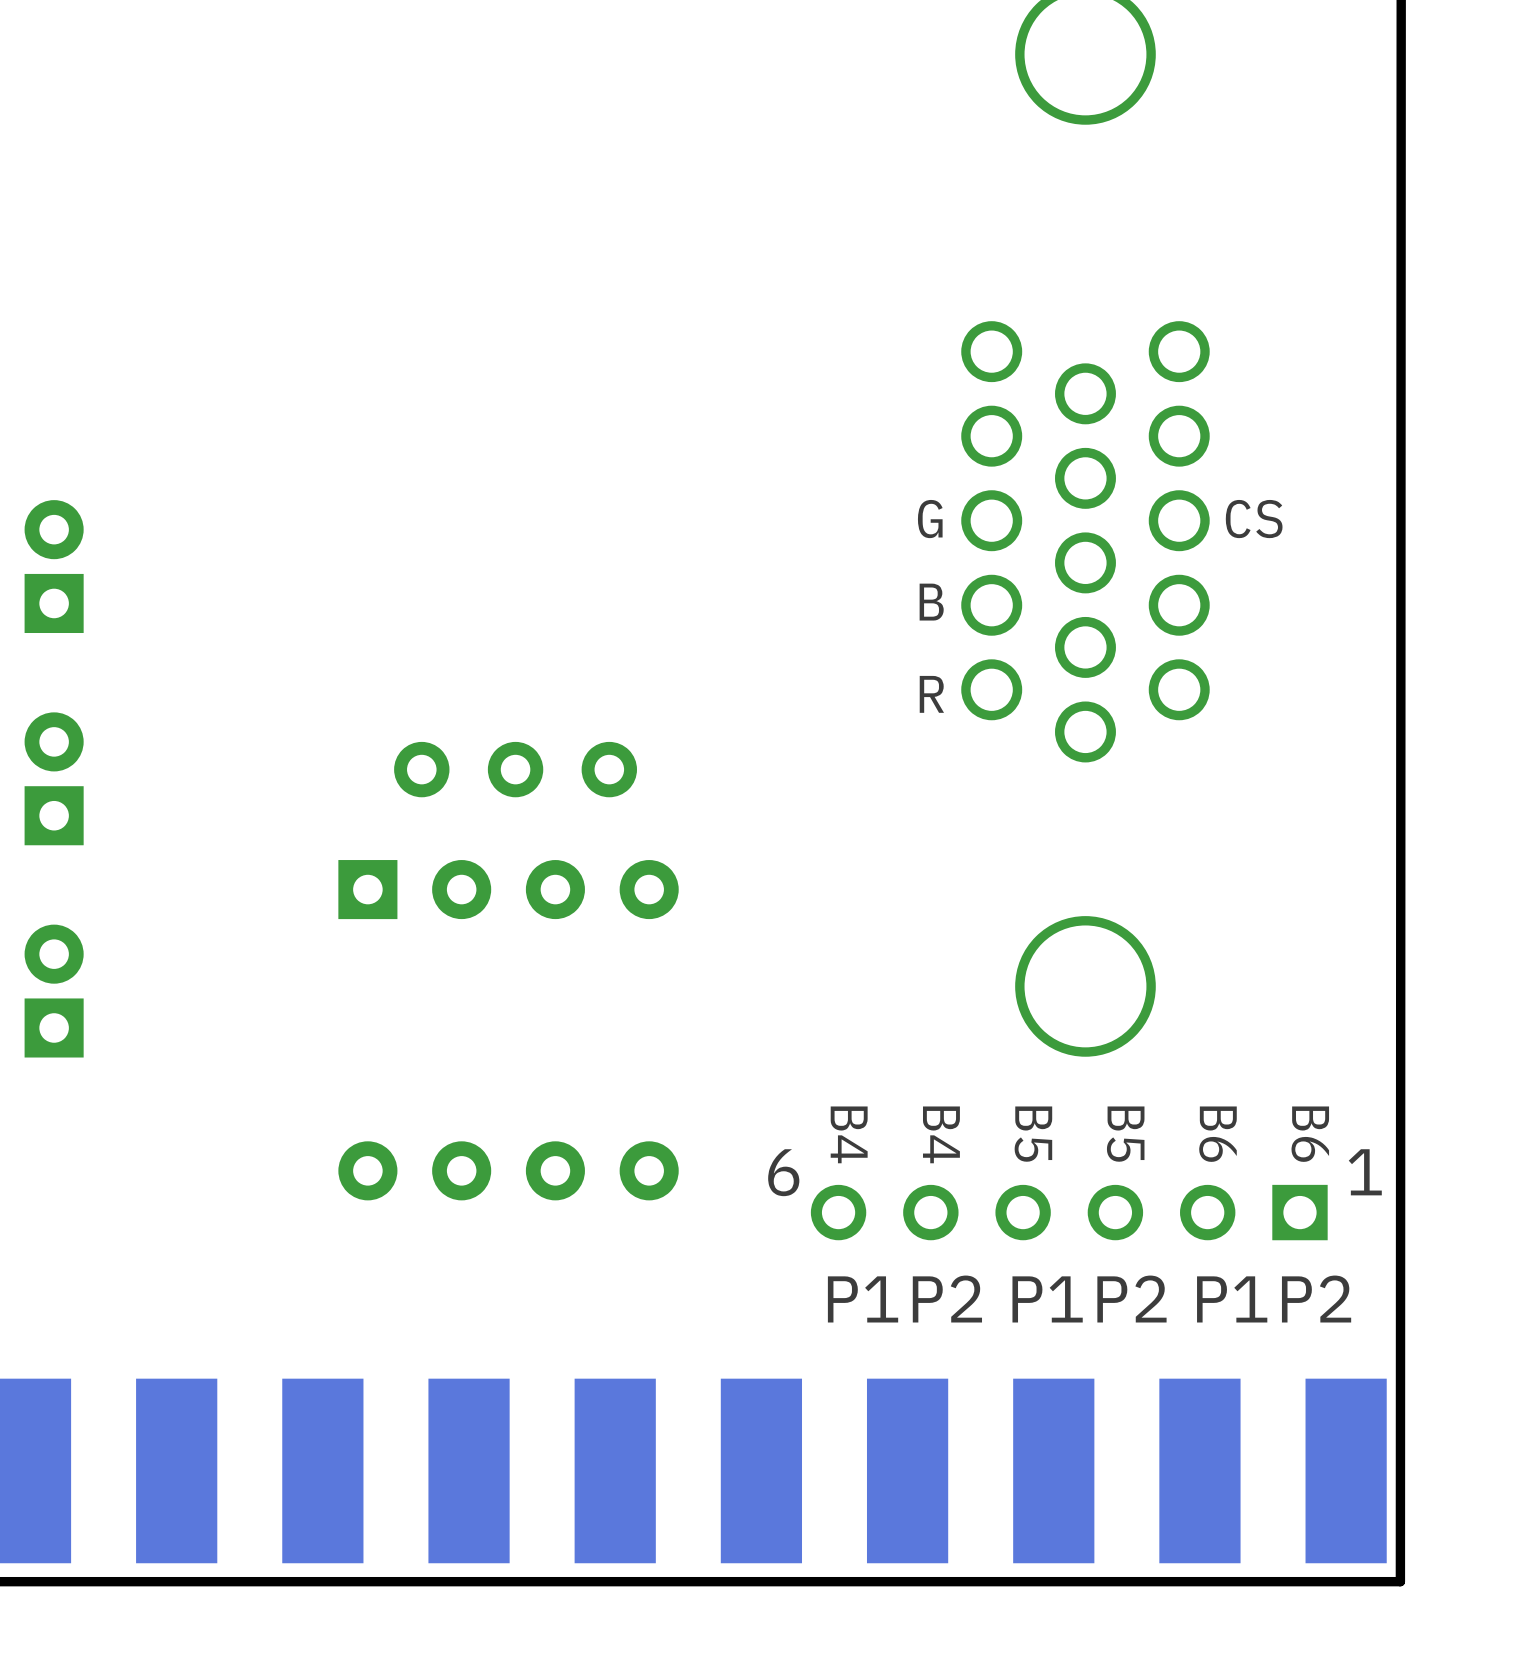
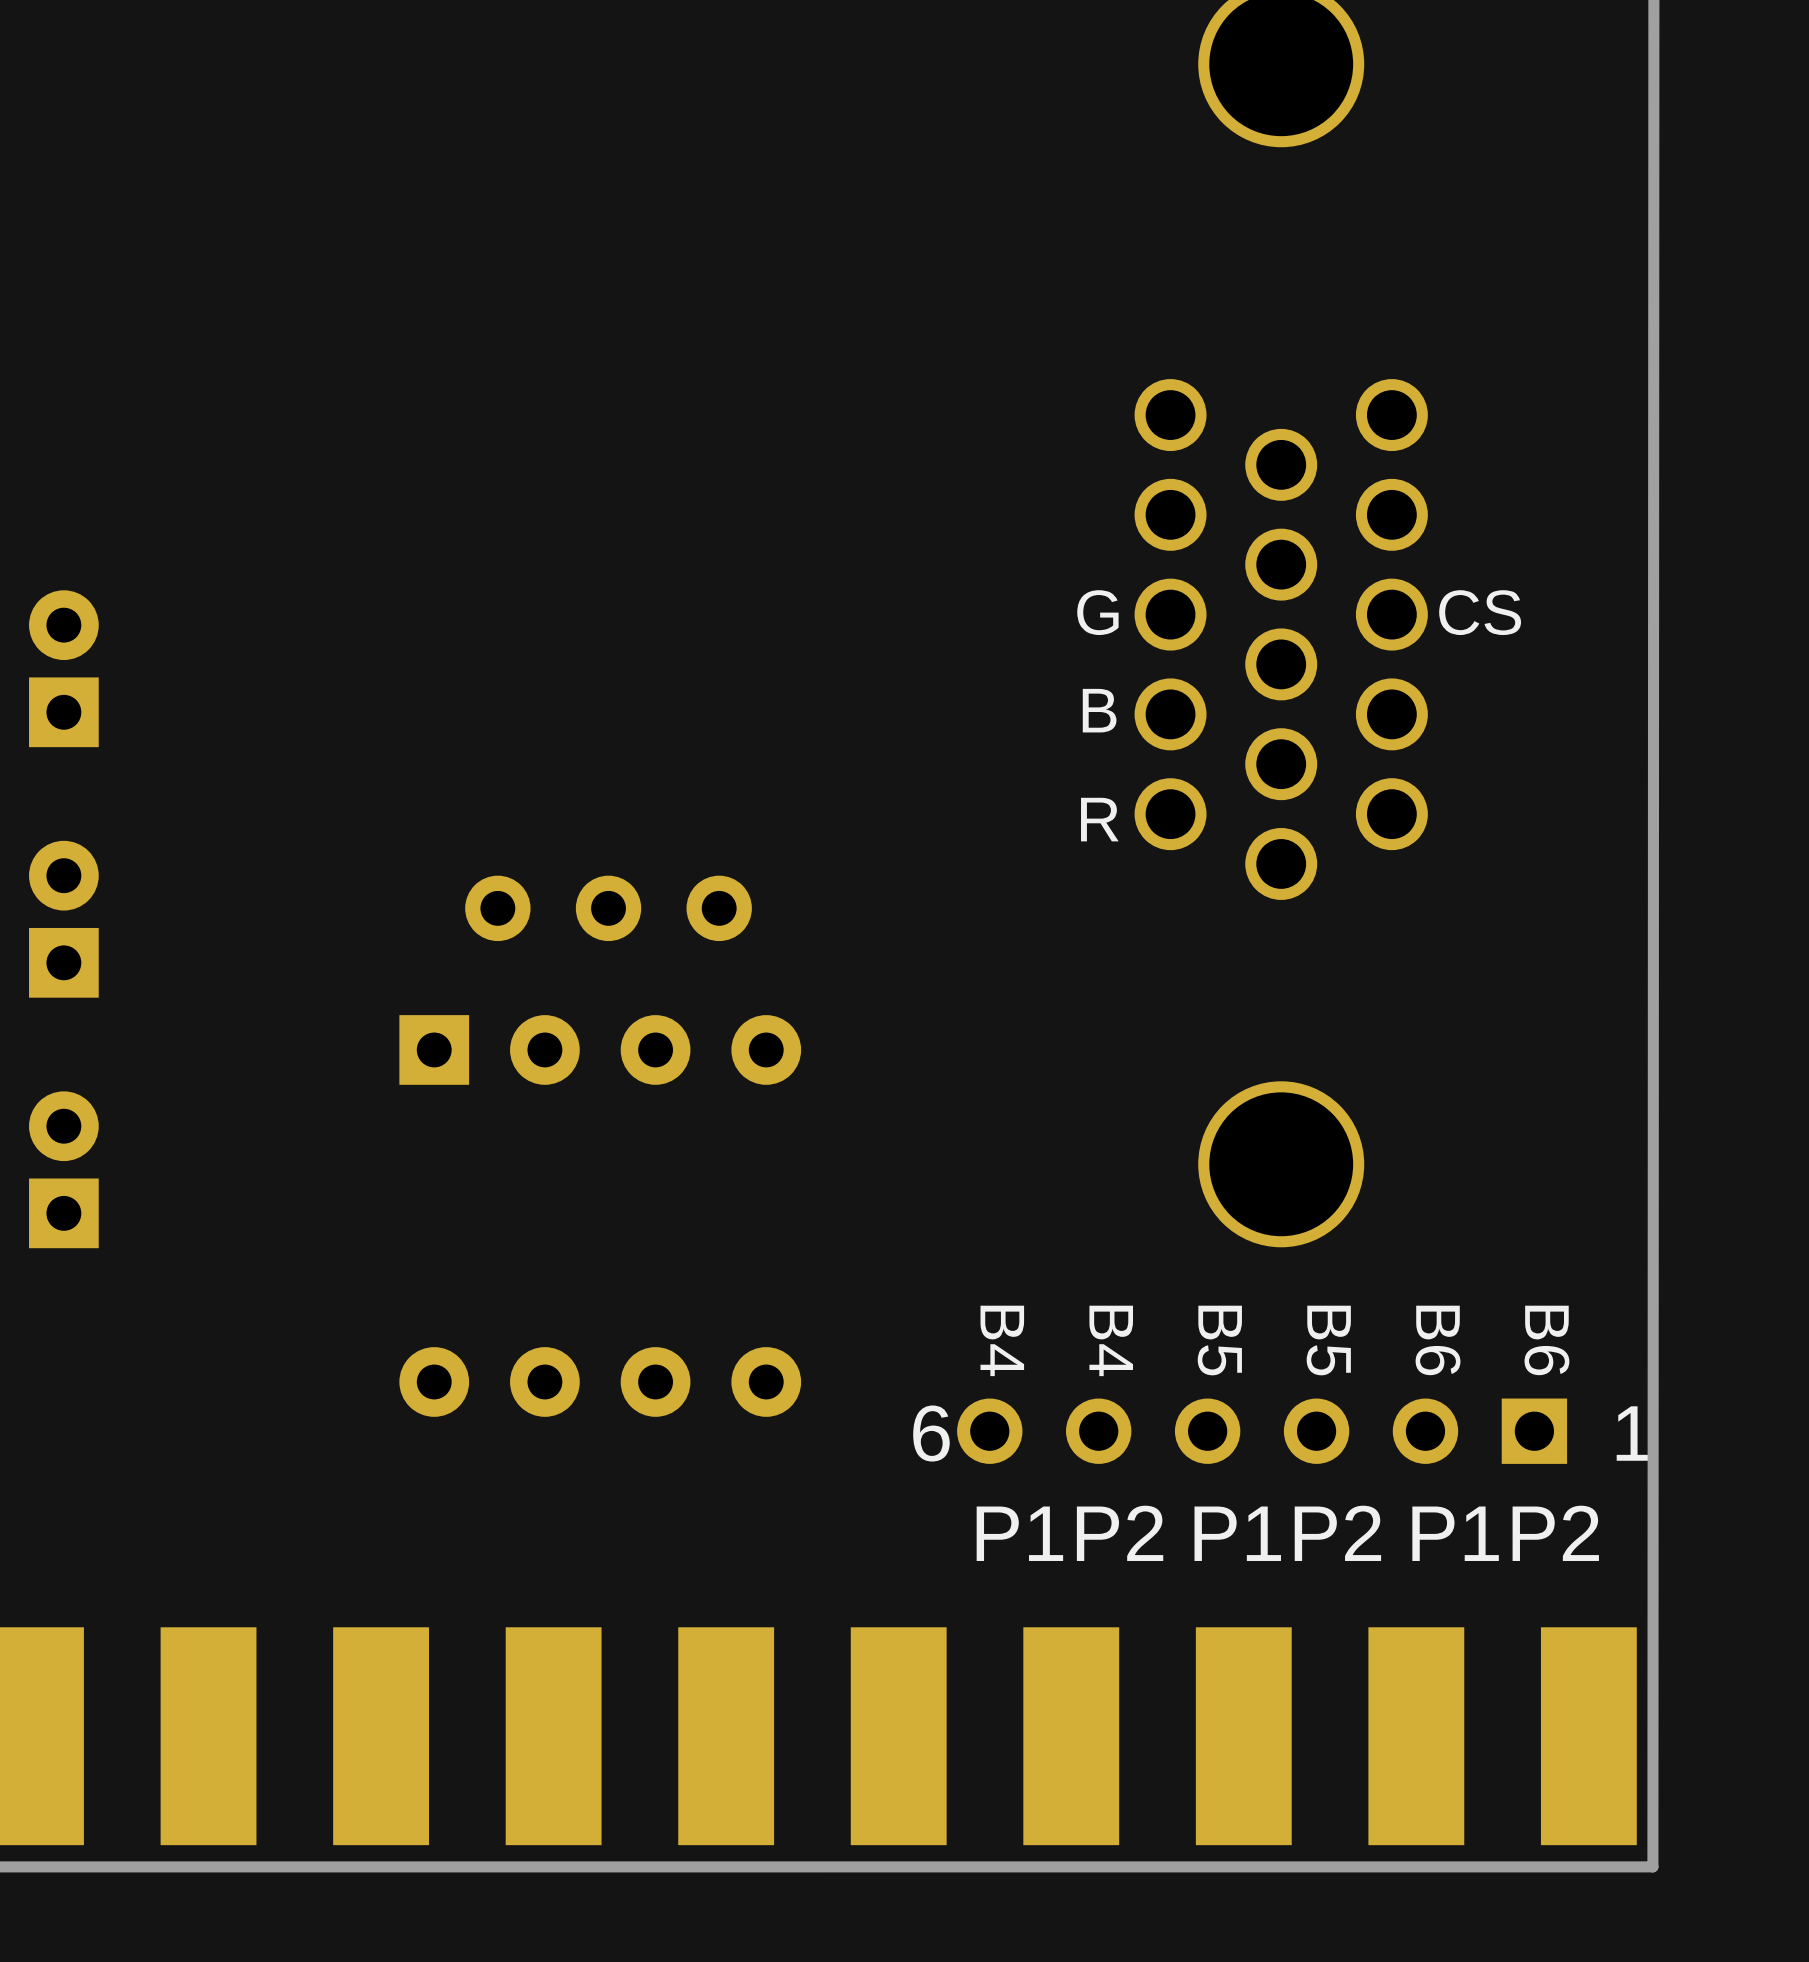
text position: 6 (783, 1172) -> 6 (931, 1433)
text position: 1 (1365, 1172) -> 1 (1633, 1433)

